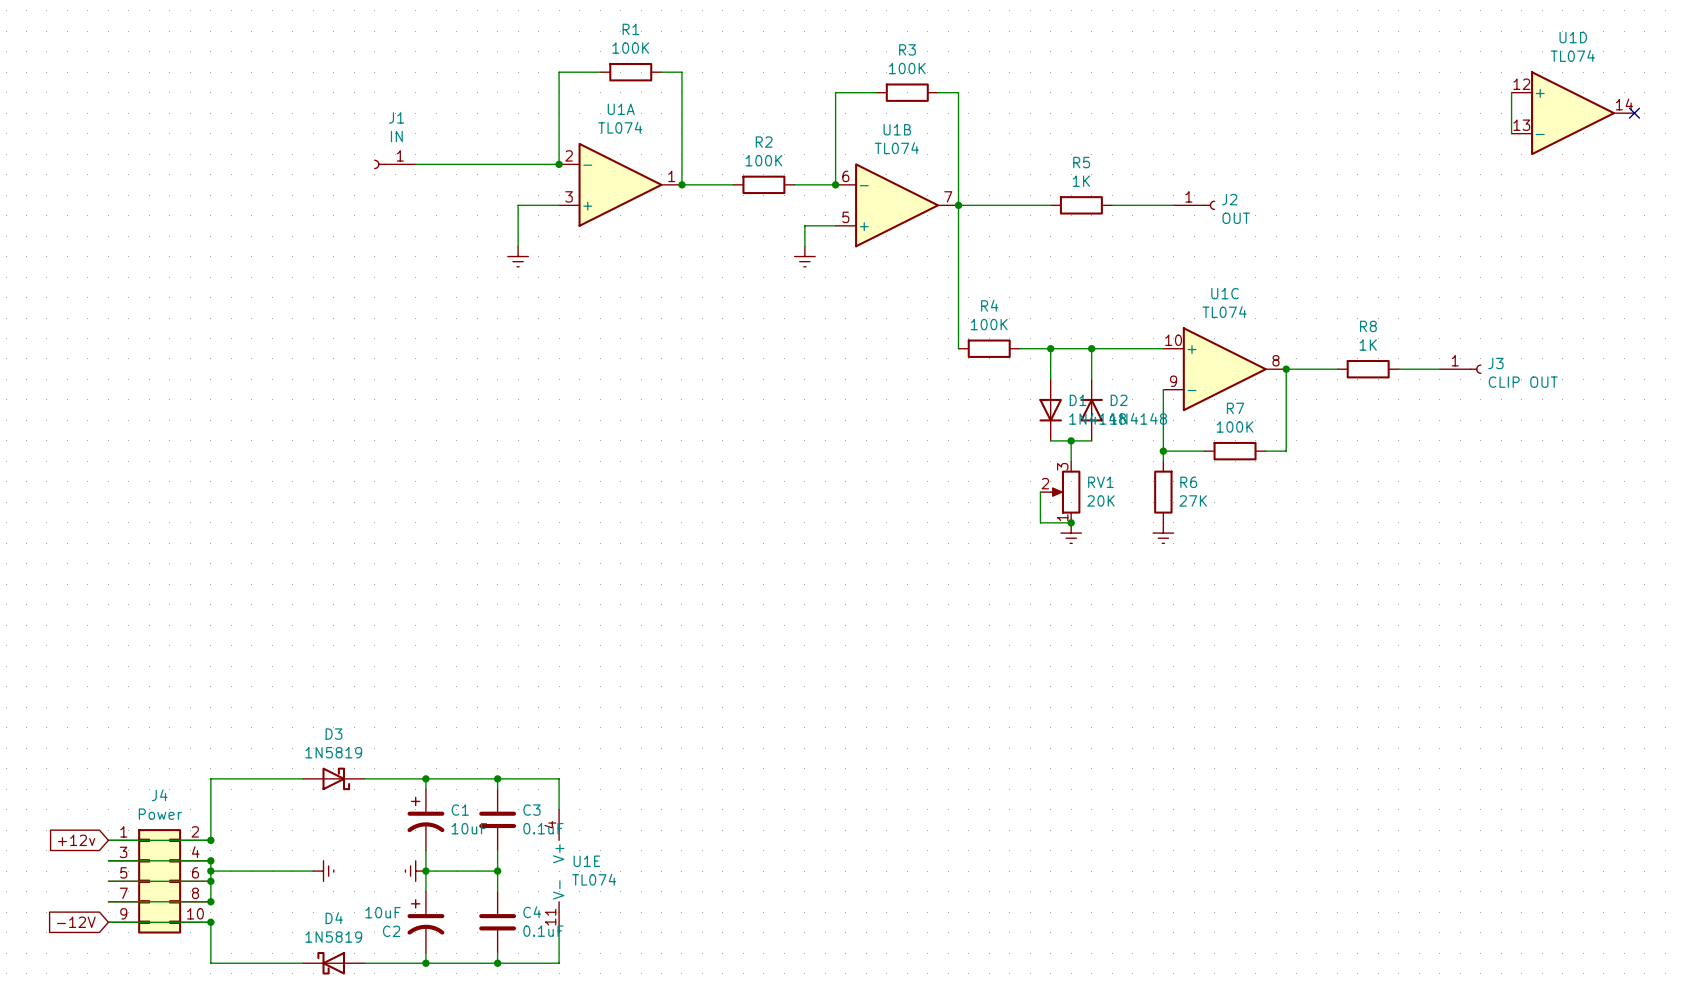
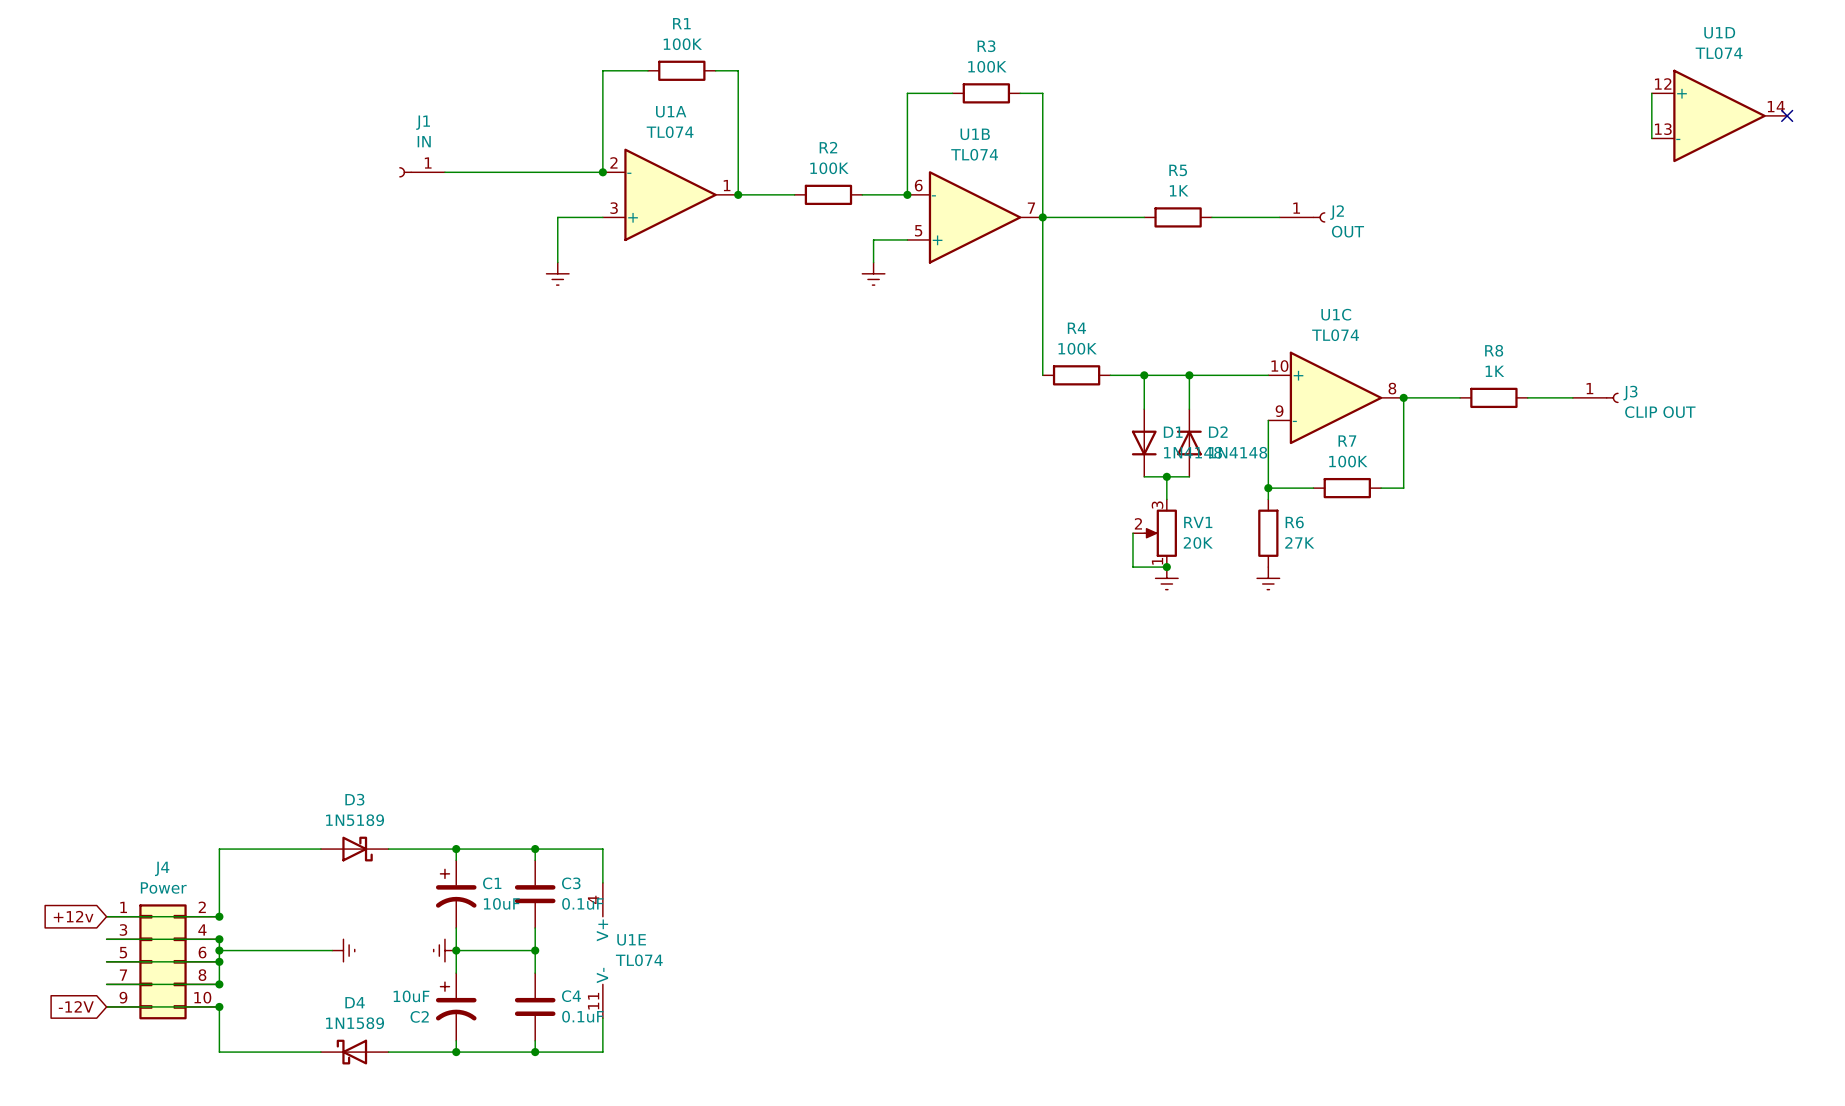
D3 value: 1N5819 (333, 752) -> 1N5189 (355, 820)
D4 value: 1N5819 (333, 937) -> 1N1589 (355, 1023)

